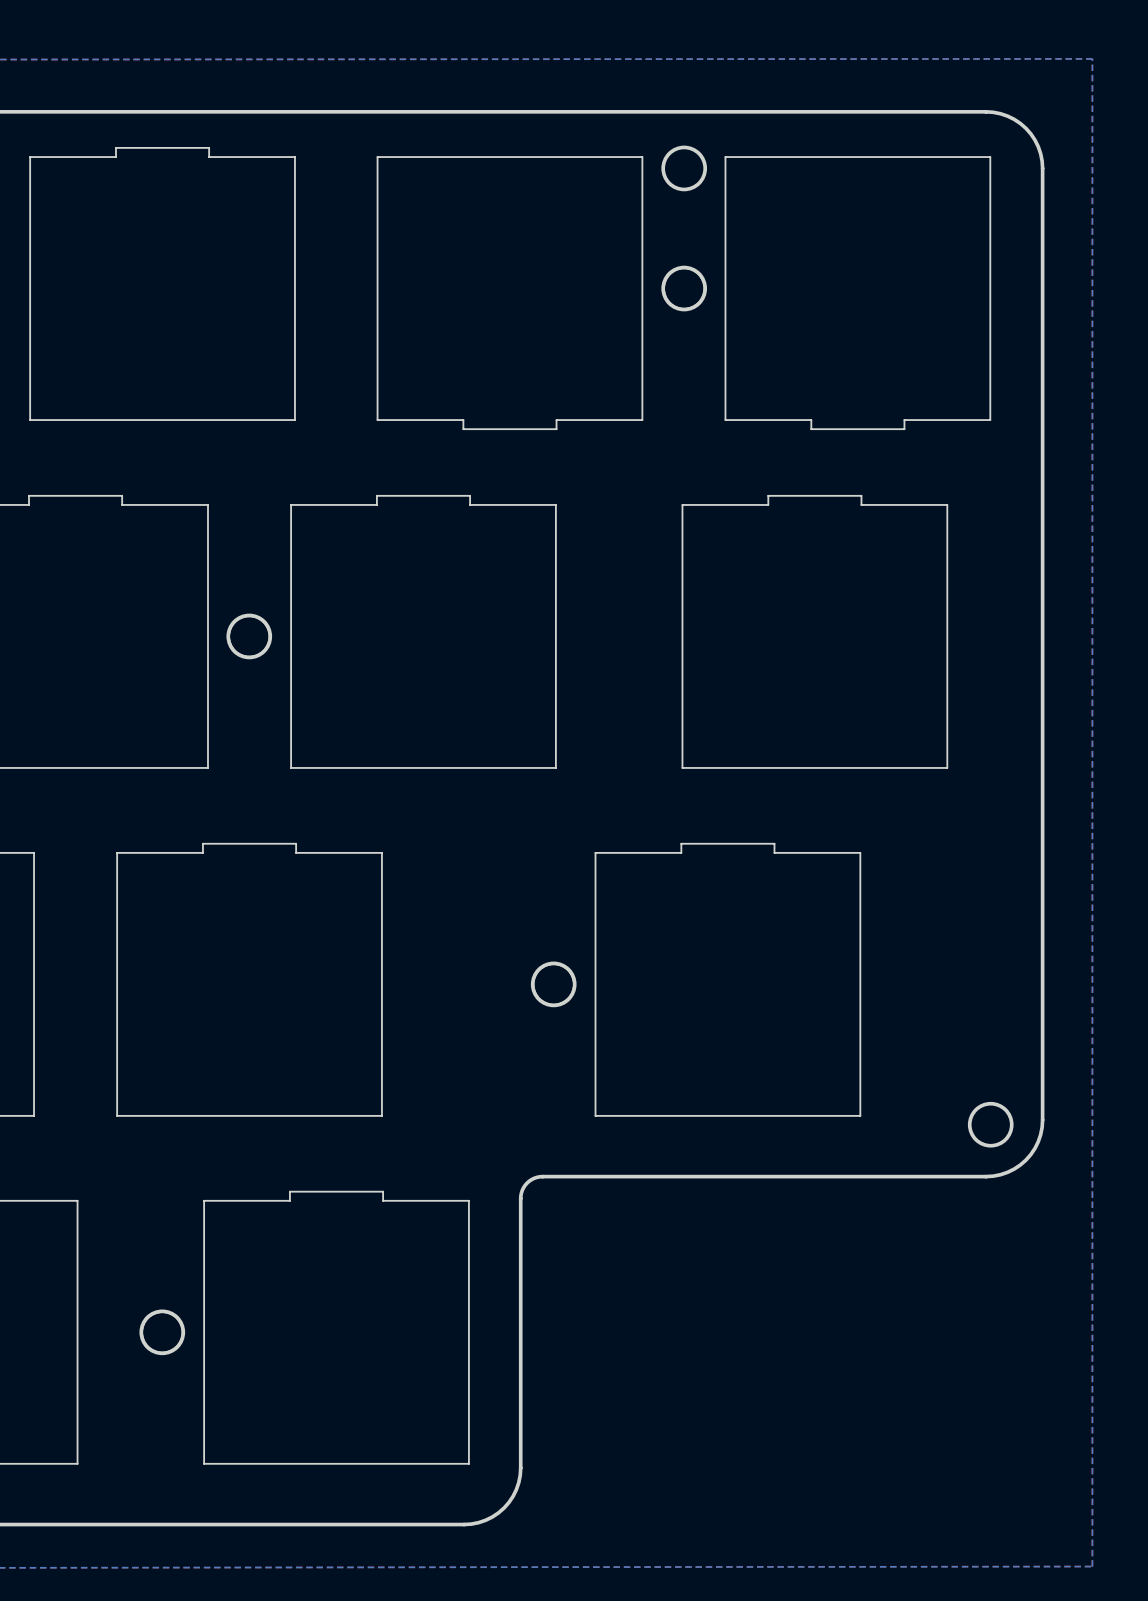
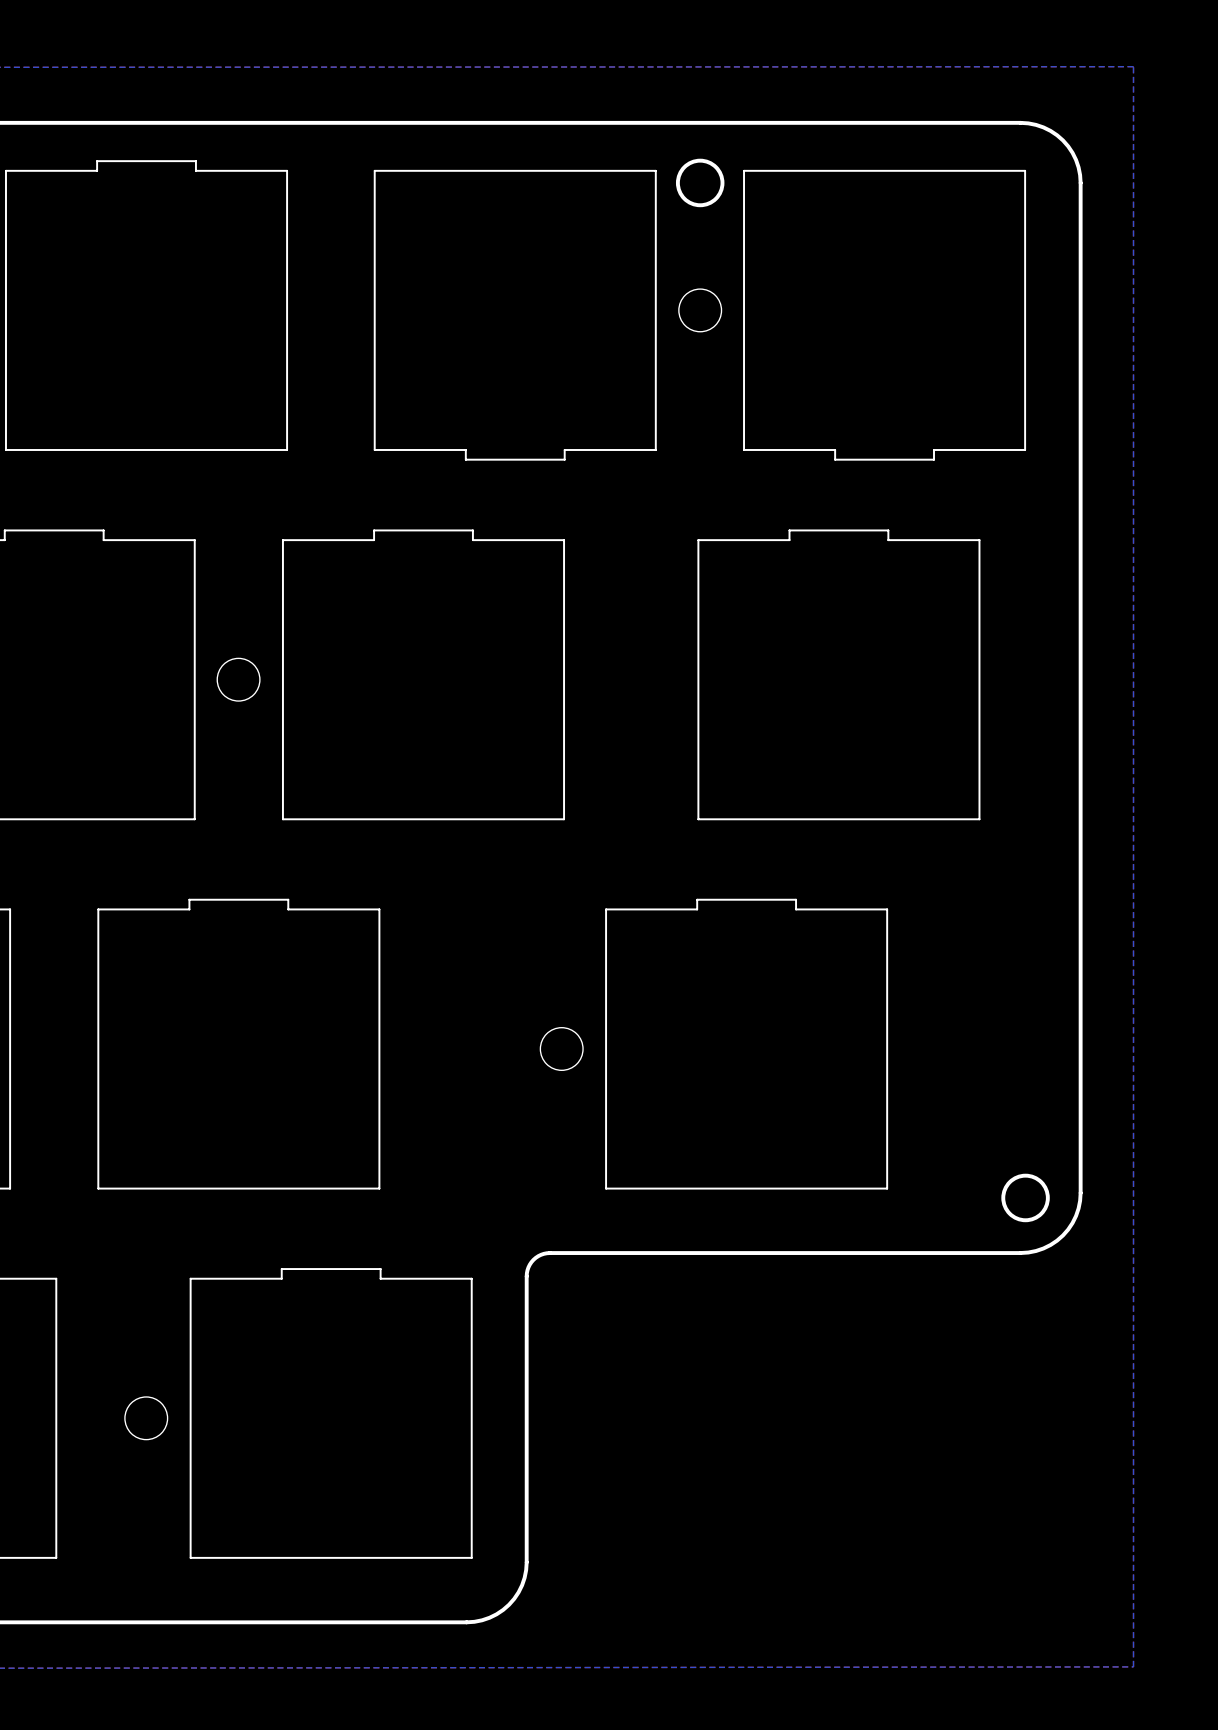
round board edge: [661, 265, 708, 312] -> none
round board edge: [226, 613, 273, 660] -> none
round board edge: [530, 961, 577, 1008] -> none
round board edge: [139, 1309, 186, 1356] -> none

